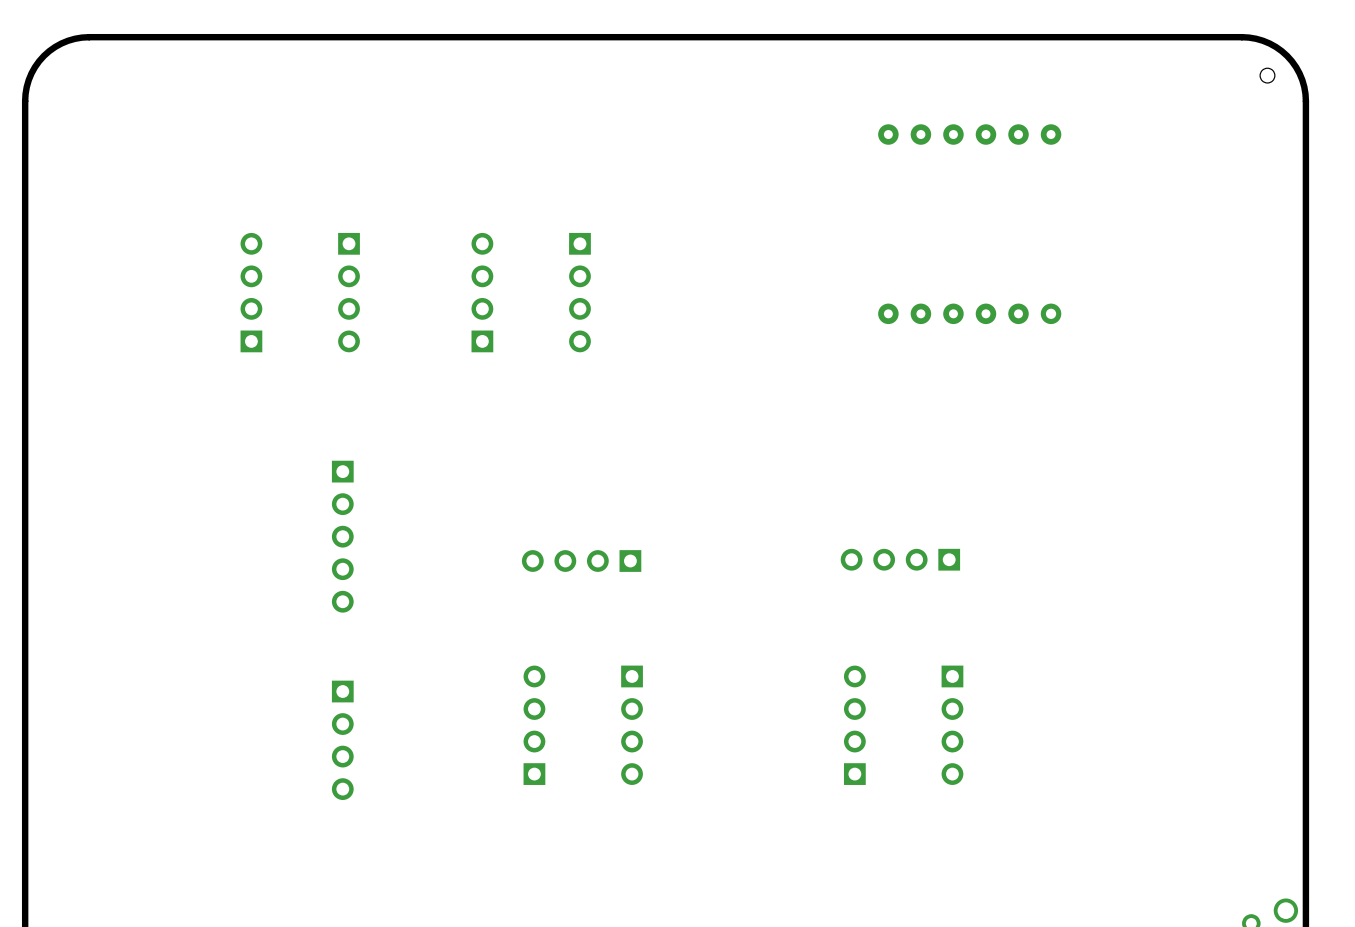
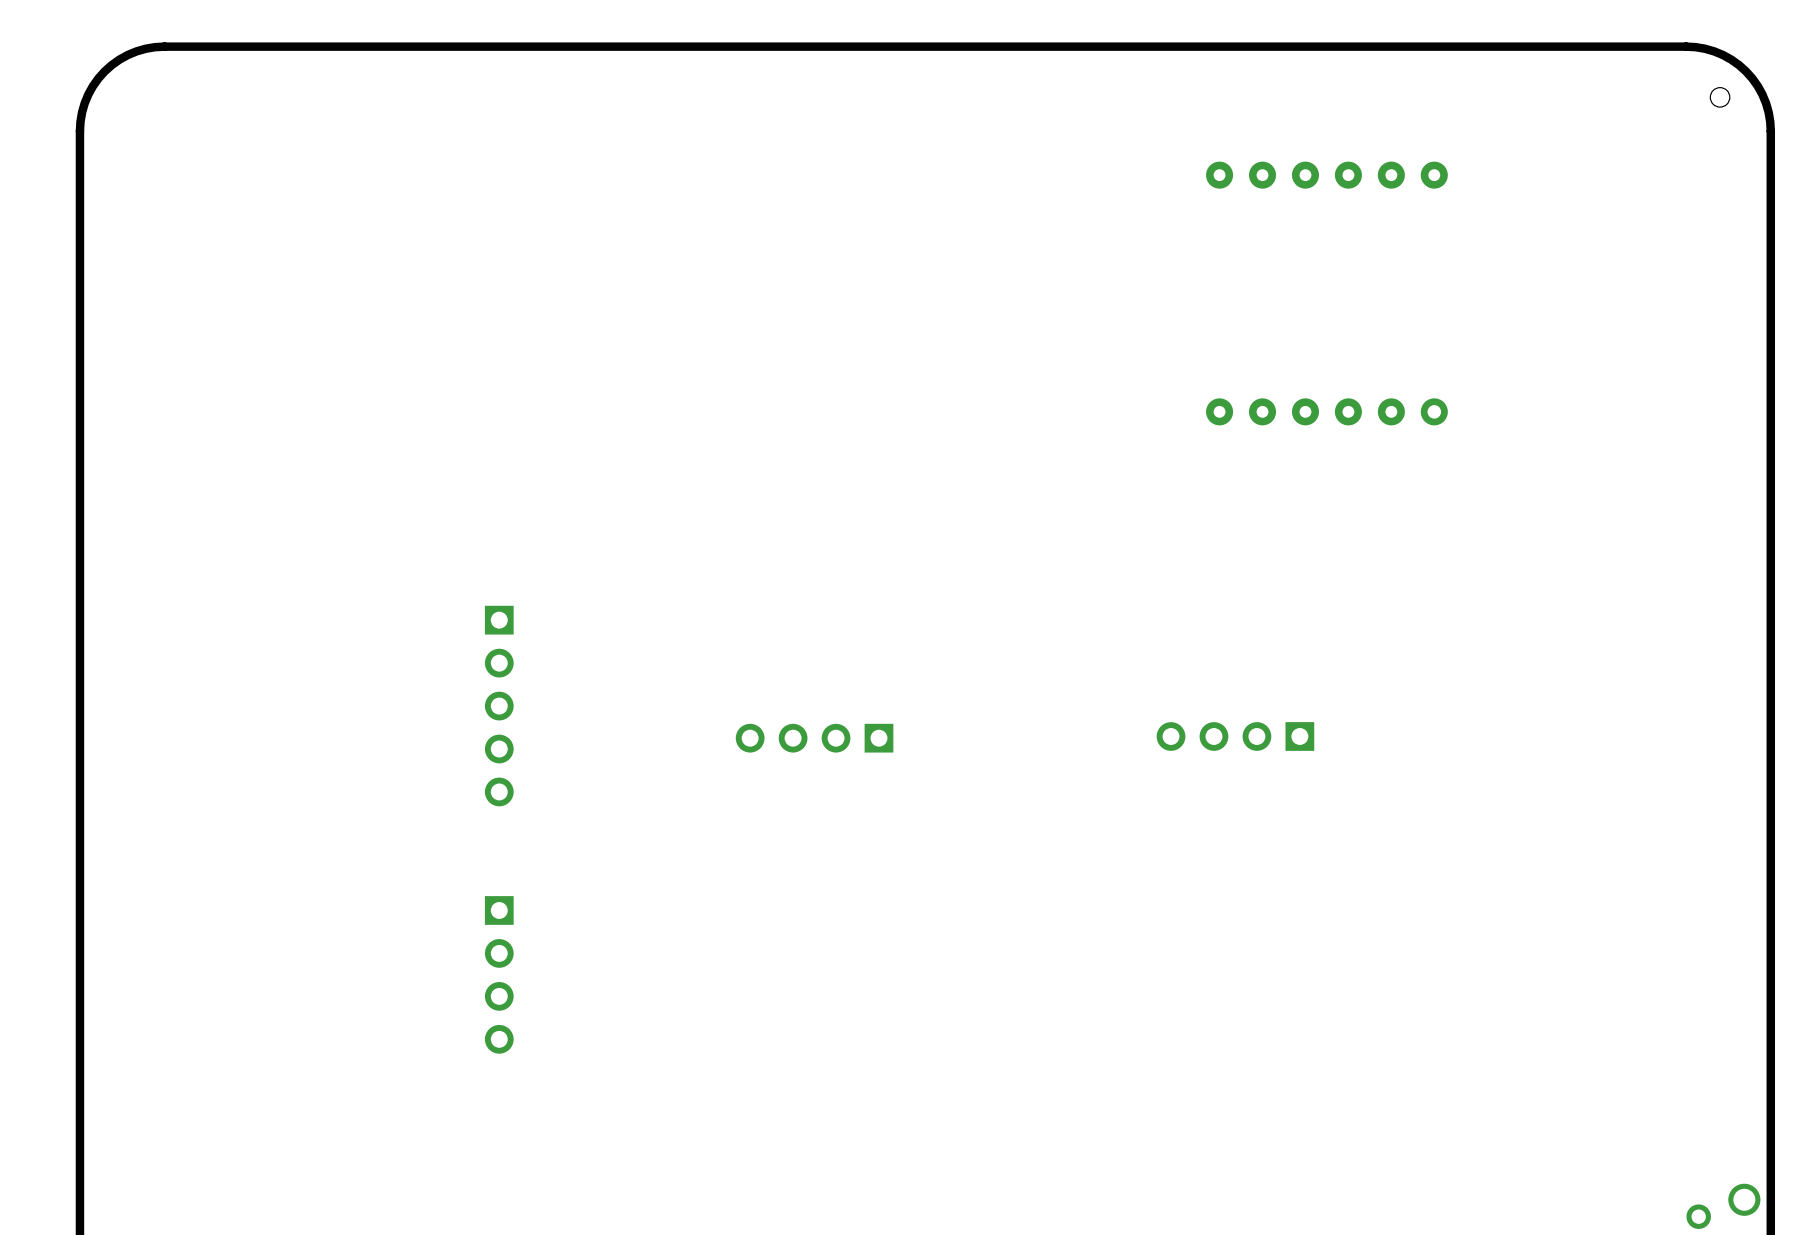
part: (251, 292) -> none
part: (349, 292) -> none
part: (482, 292) -> none
part: (579, 292) -> none
part: (534, 725) -> none
part: (632, 725) -> none
part: (854, 725) -> none
part: (952, 725) -> none

